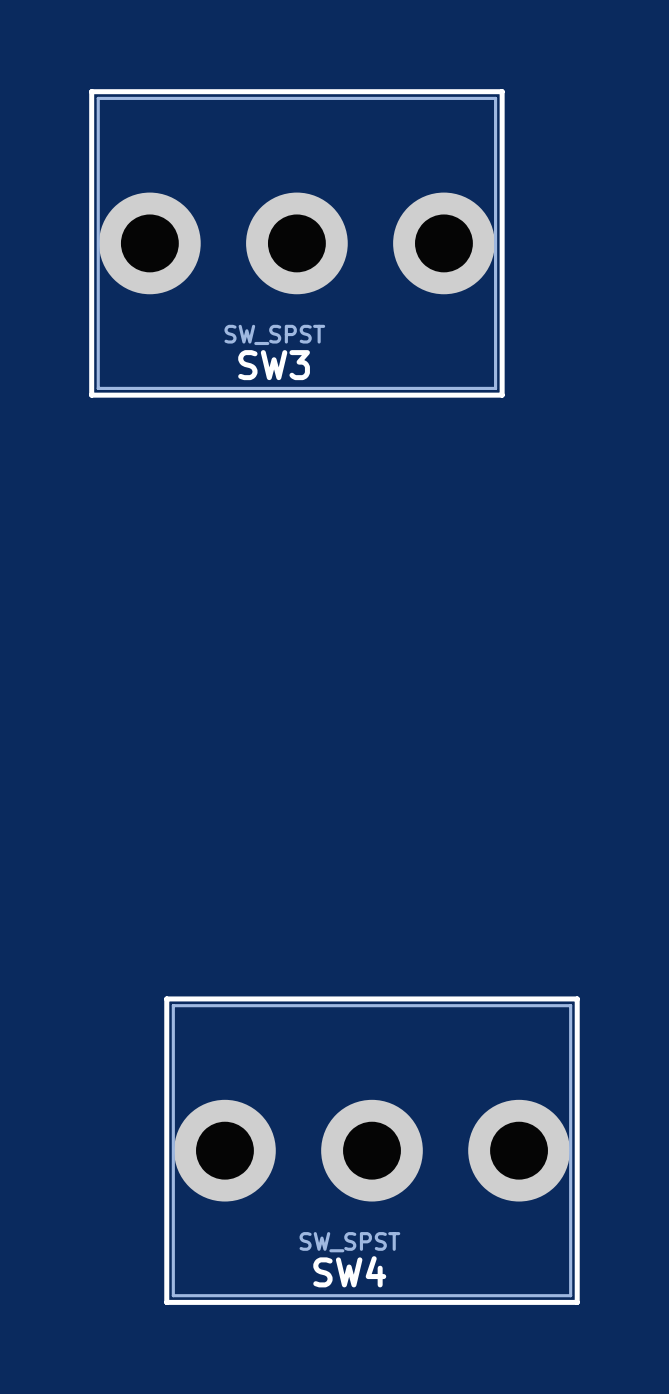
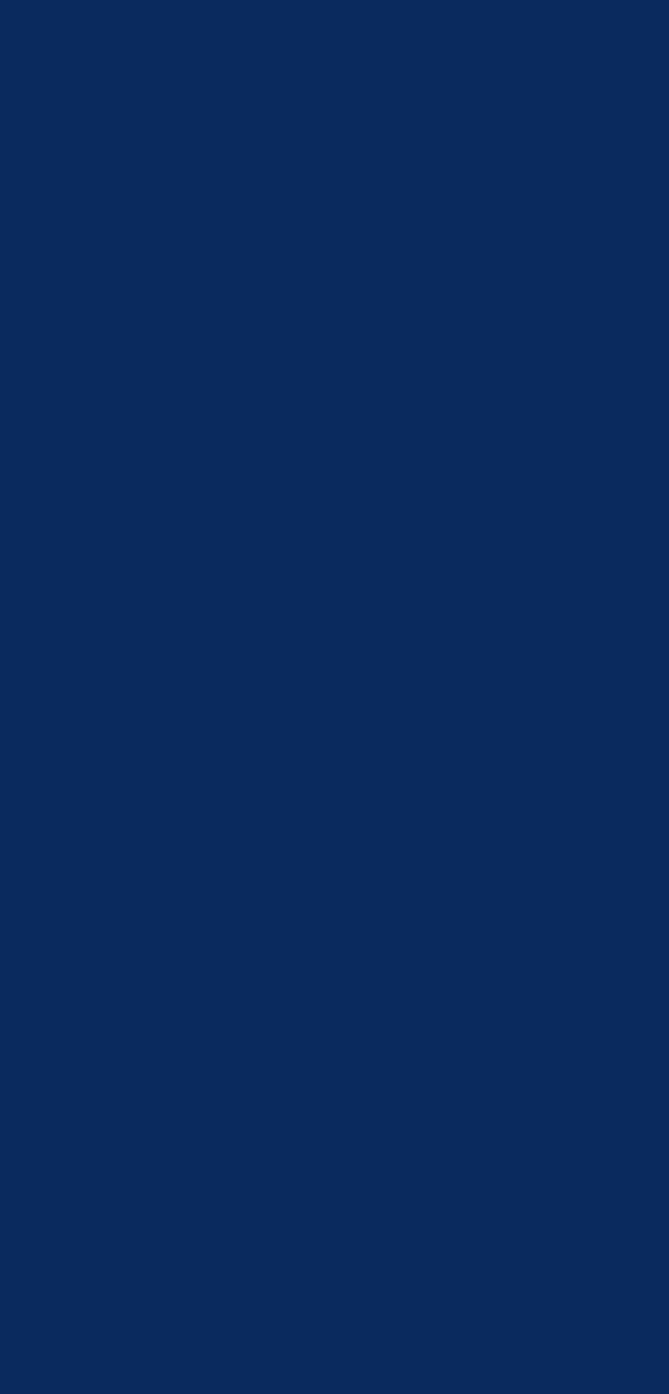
SW3: SW_SPST (296, 243) -> none
SW4: SW_SPST (371, 1150) -> none

